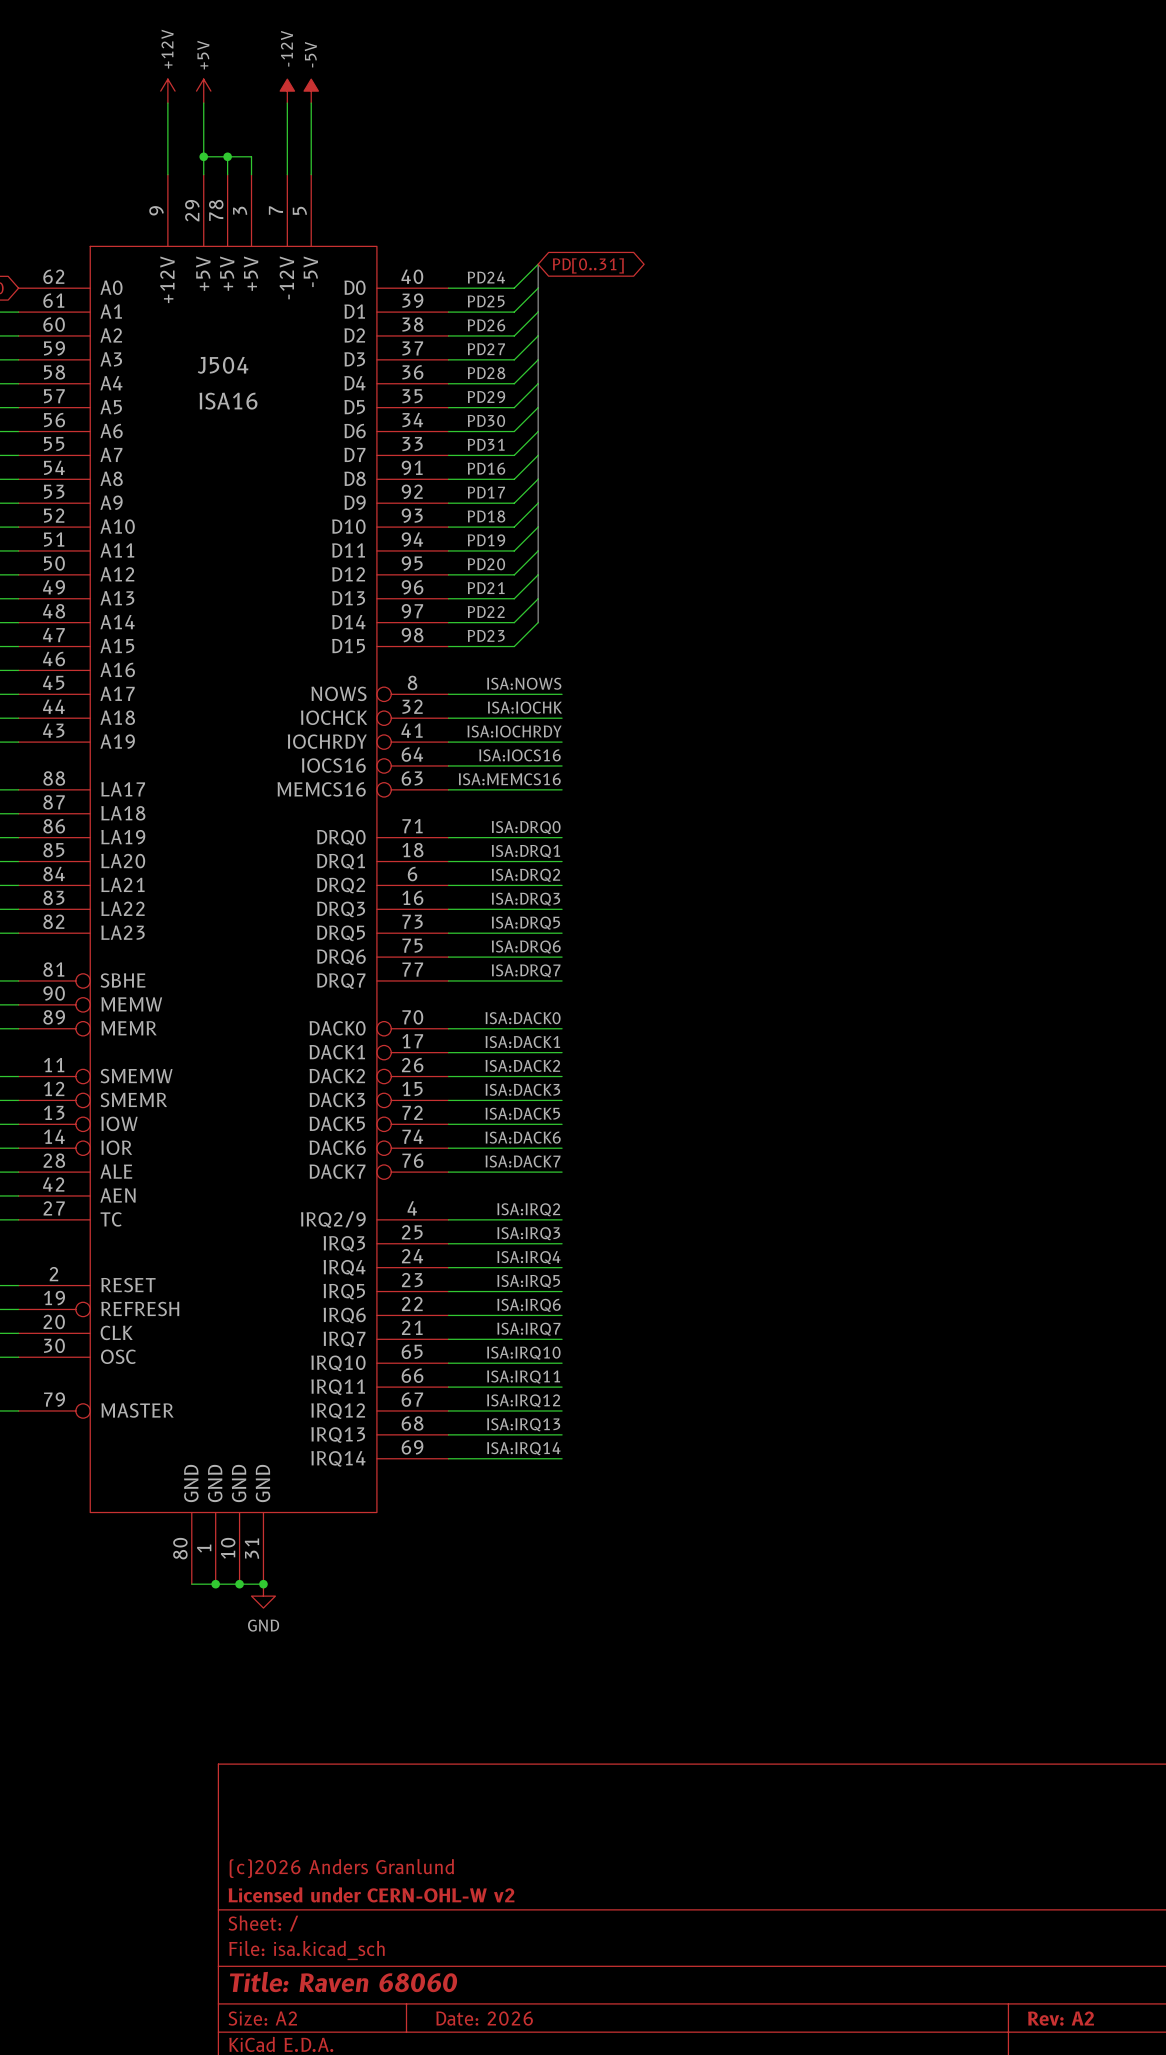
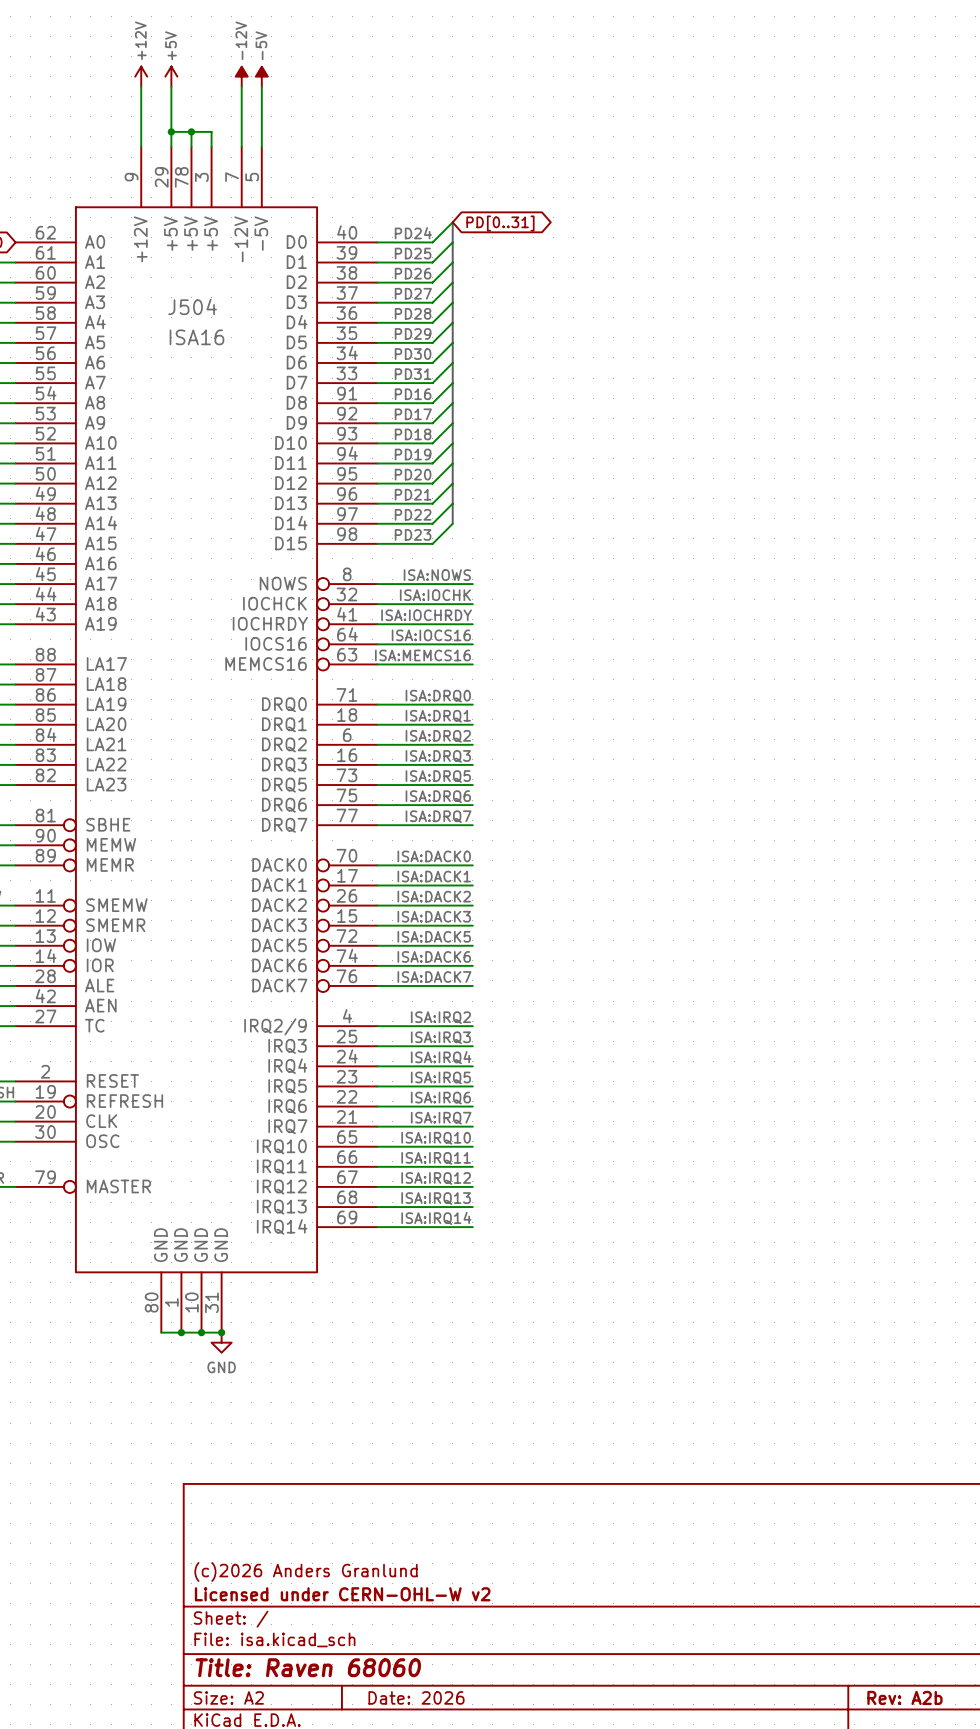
title block: Rev: A2 (1061, 2018) -> Rev: A2b (904, 1697)

